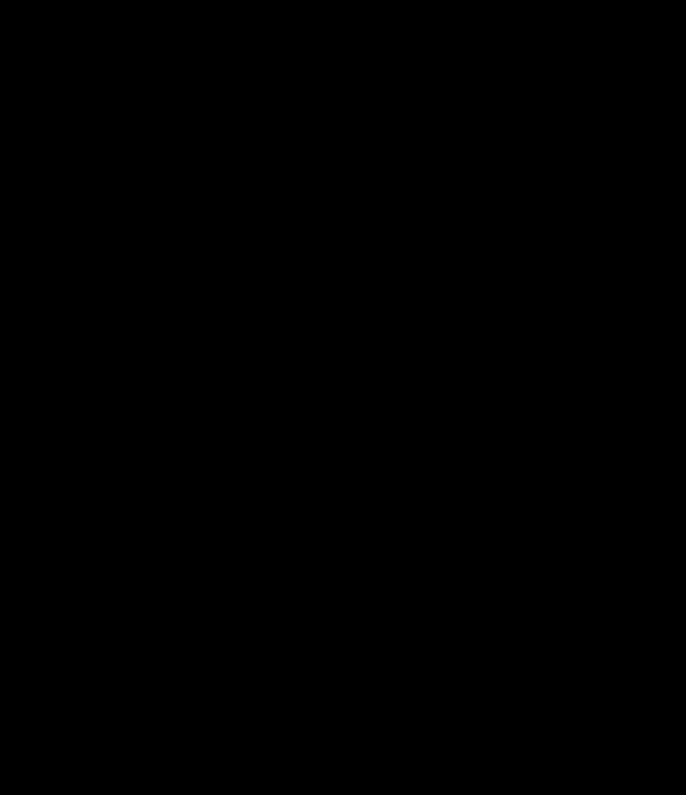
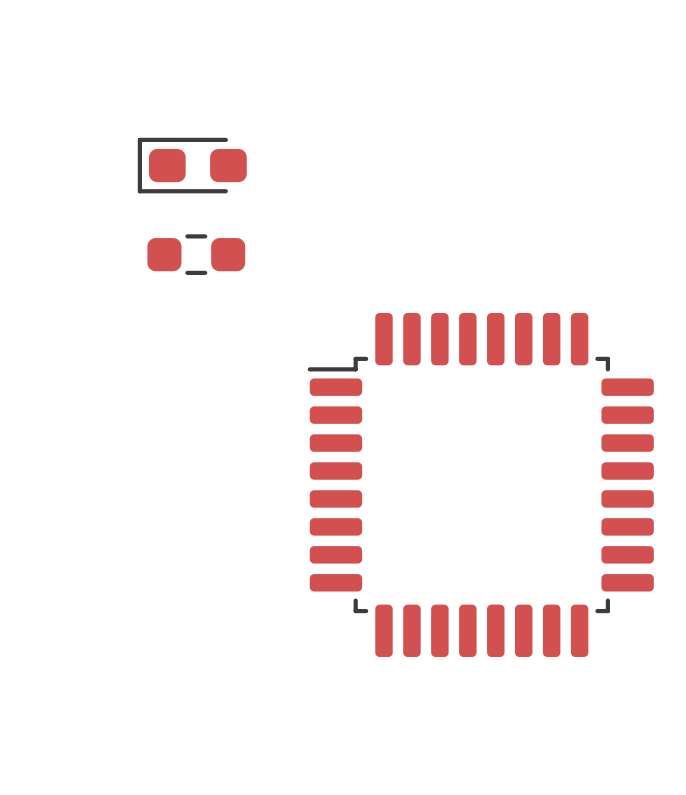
part: none -> (192, 165)
part: none -> (196, 254)
part: none -> (480, 484)

